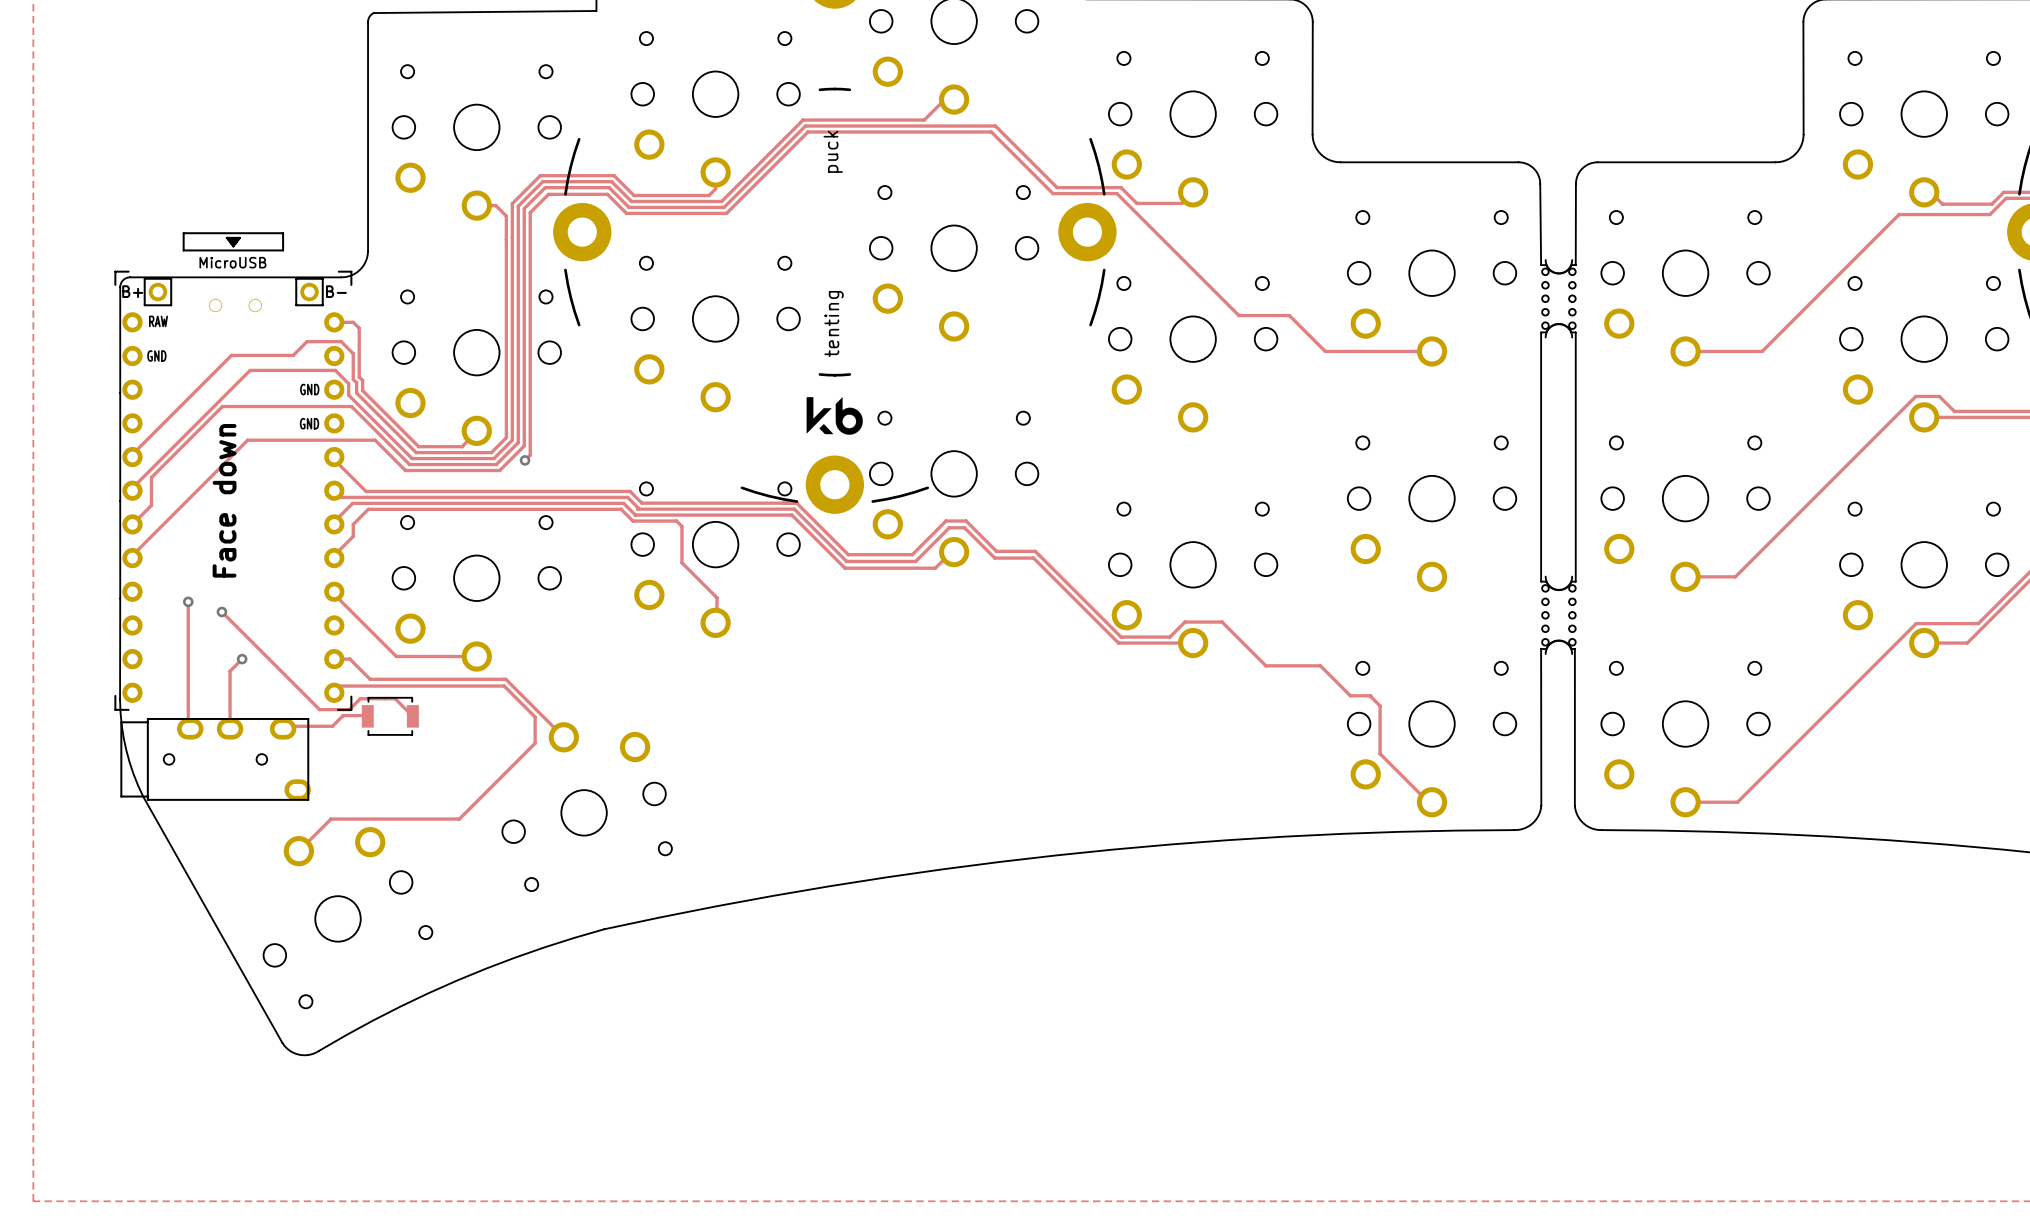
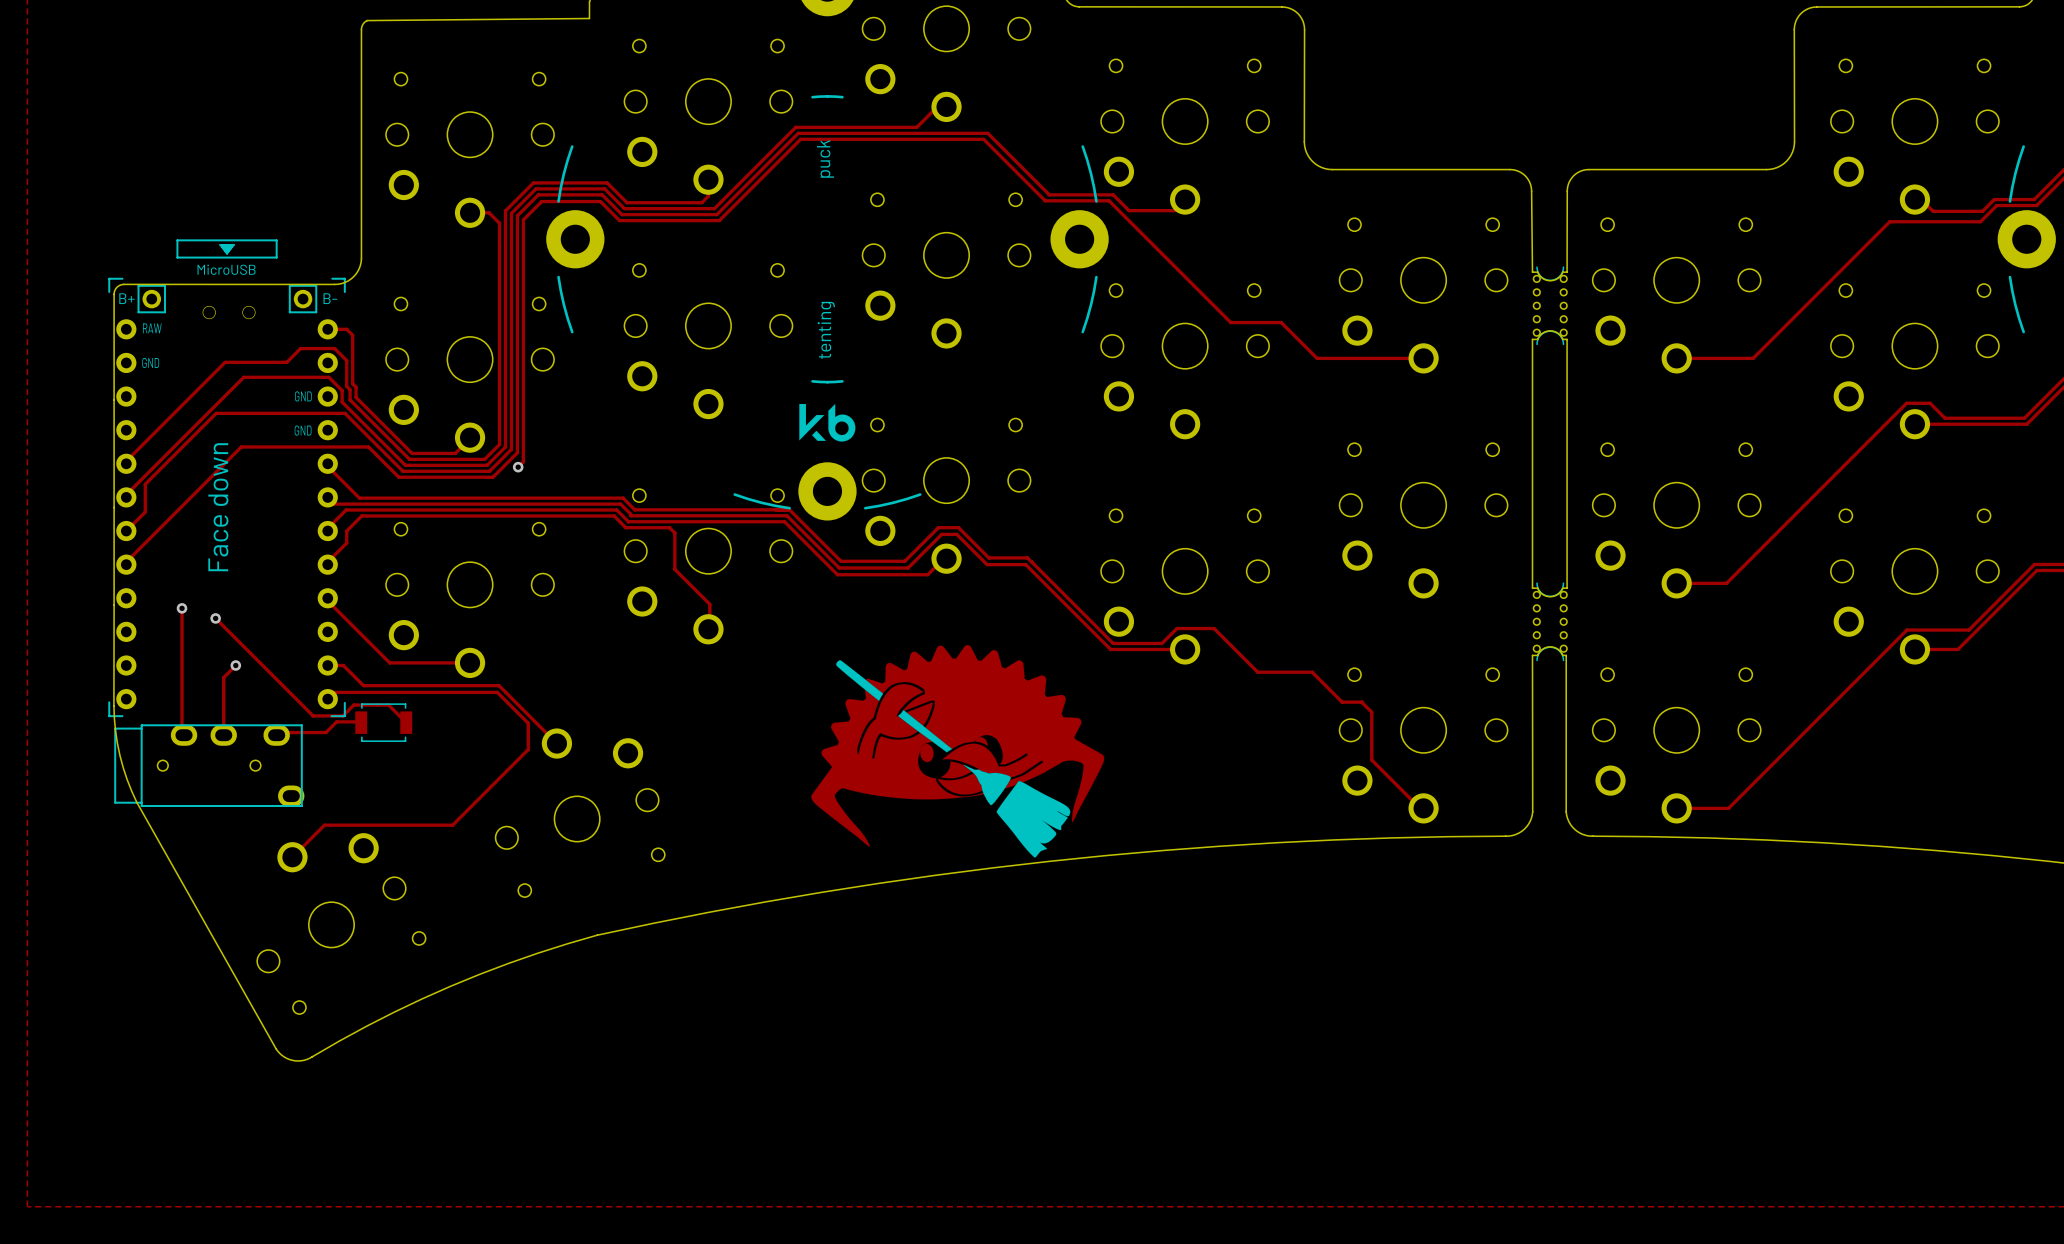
drawing: none -> [811, 645, 1105, 858]

